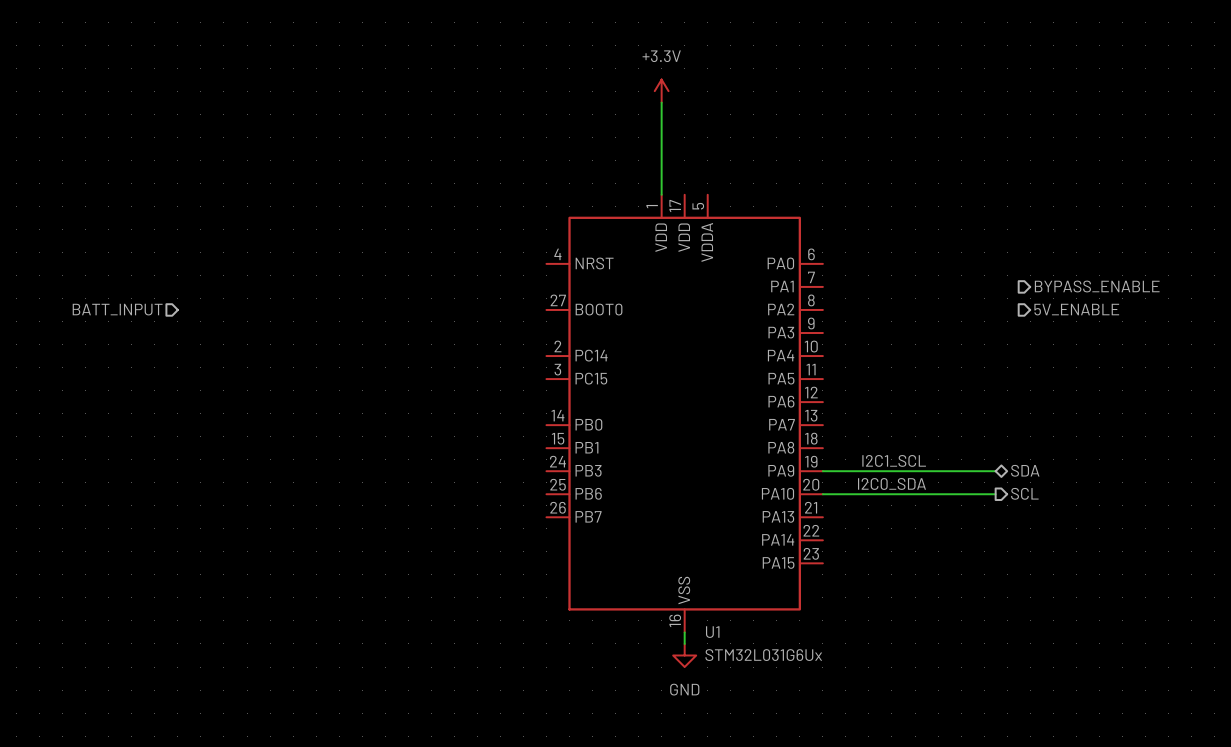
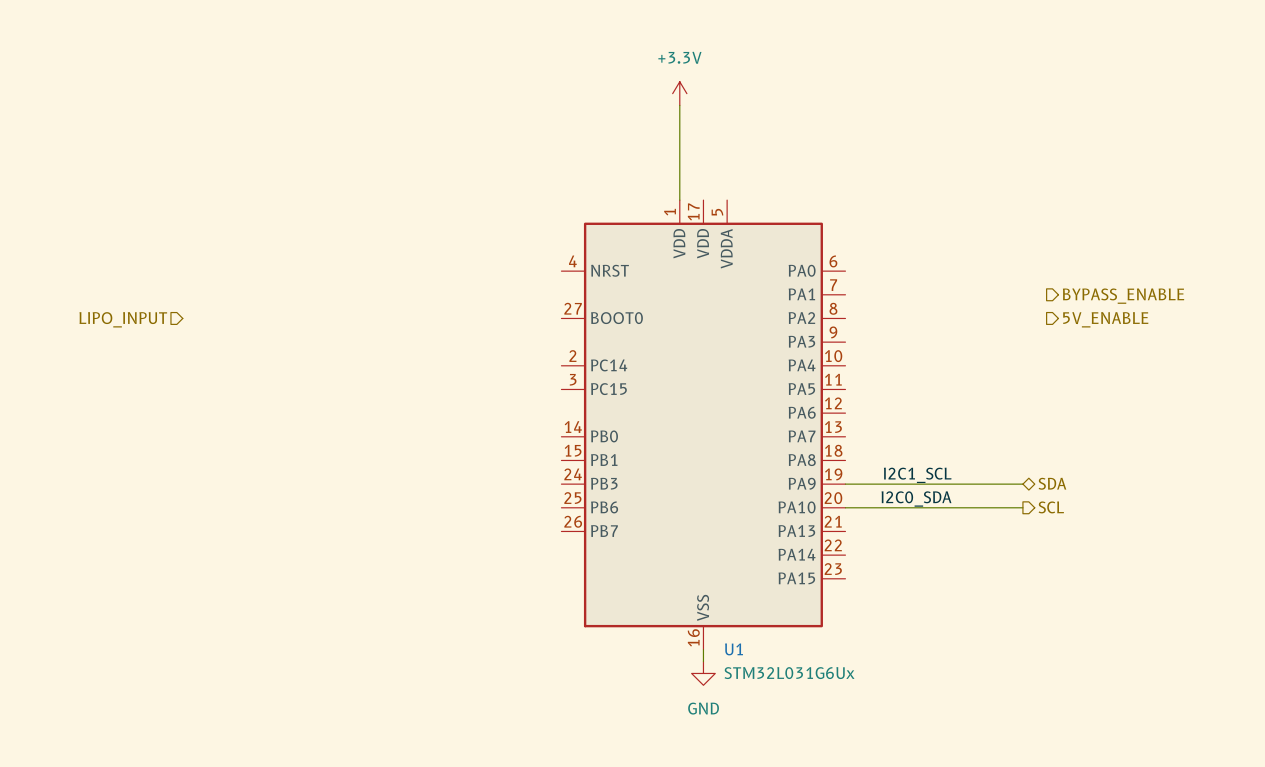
hierarchical label: BATT_INPUT (117, 309) -> LIPO_INPUT (123, 319)

